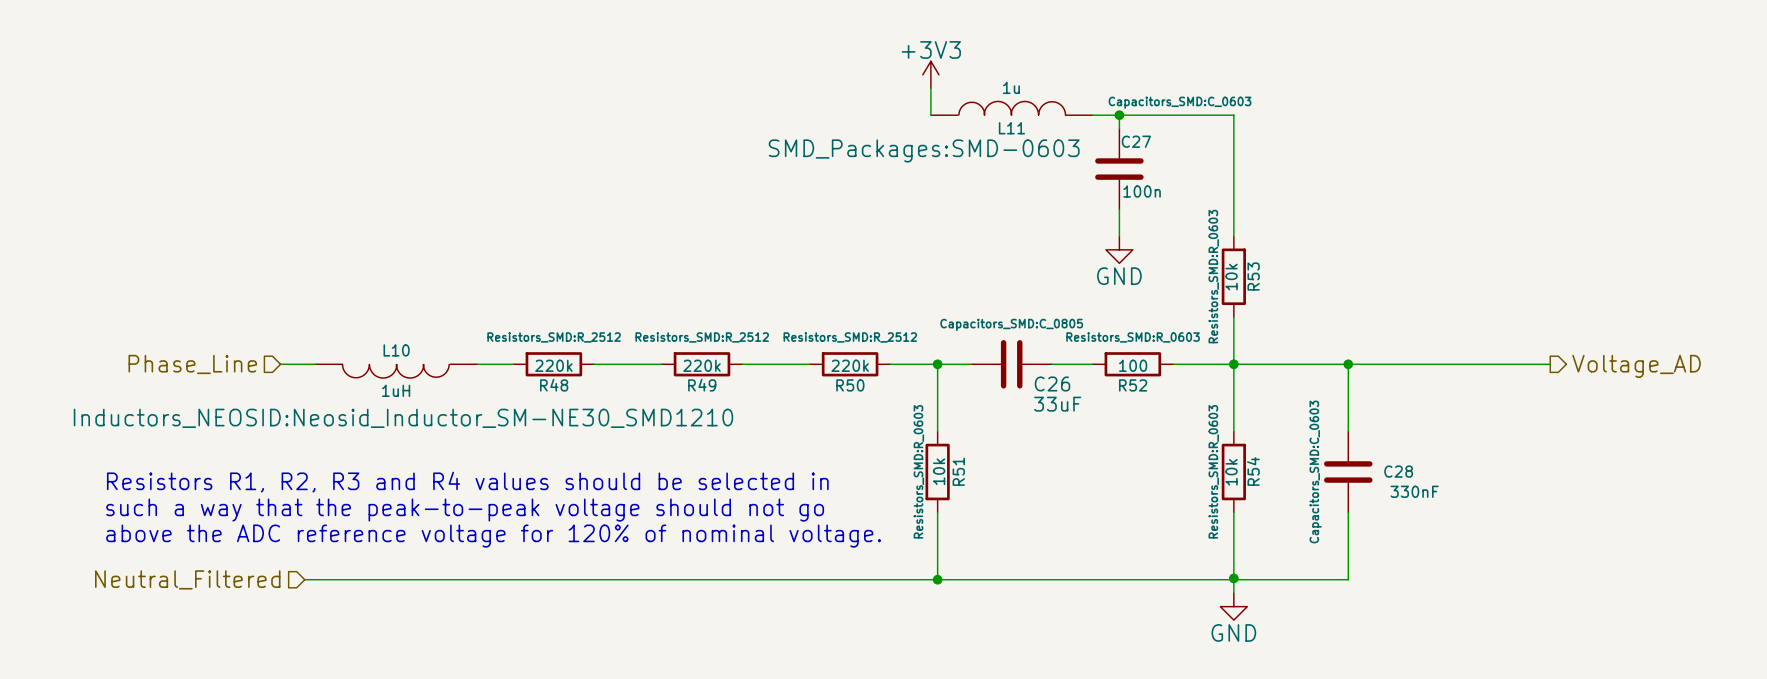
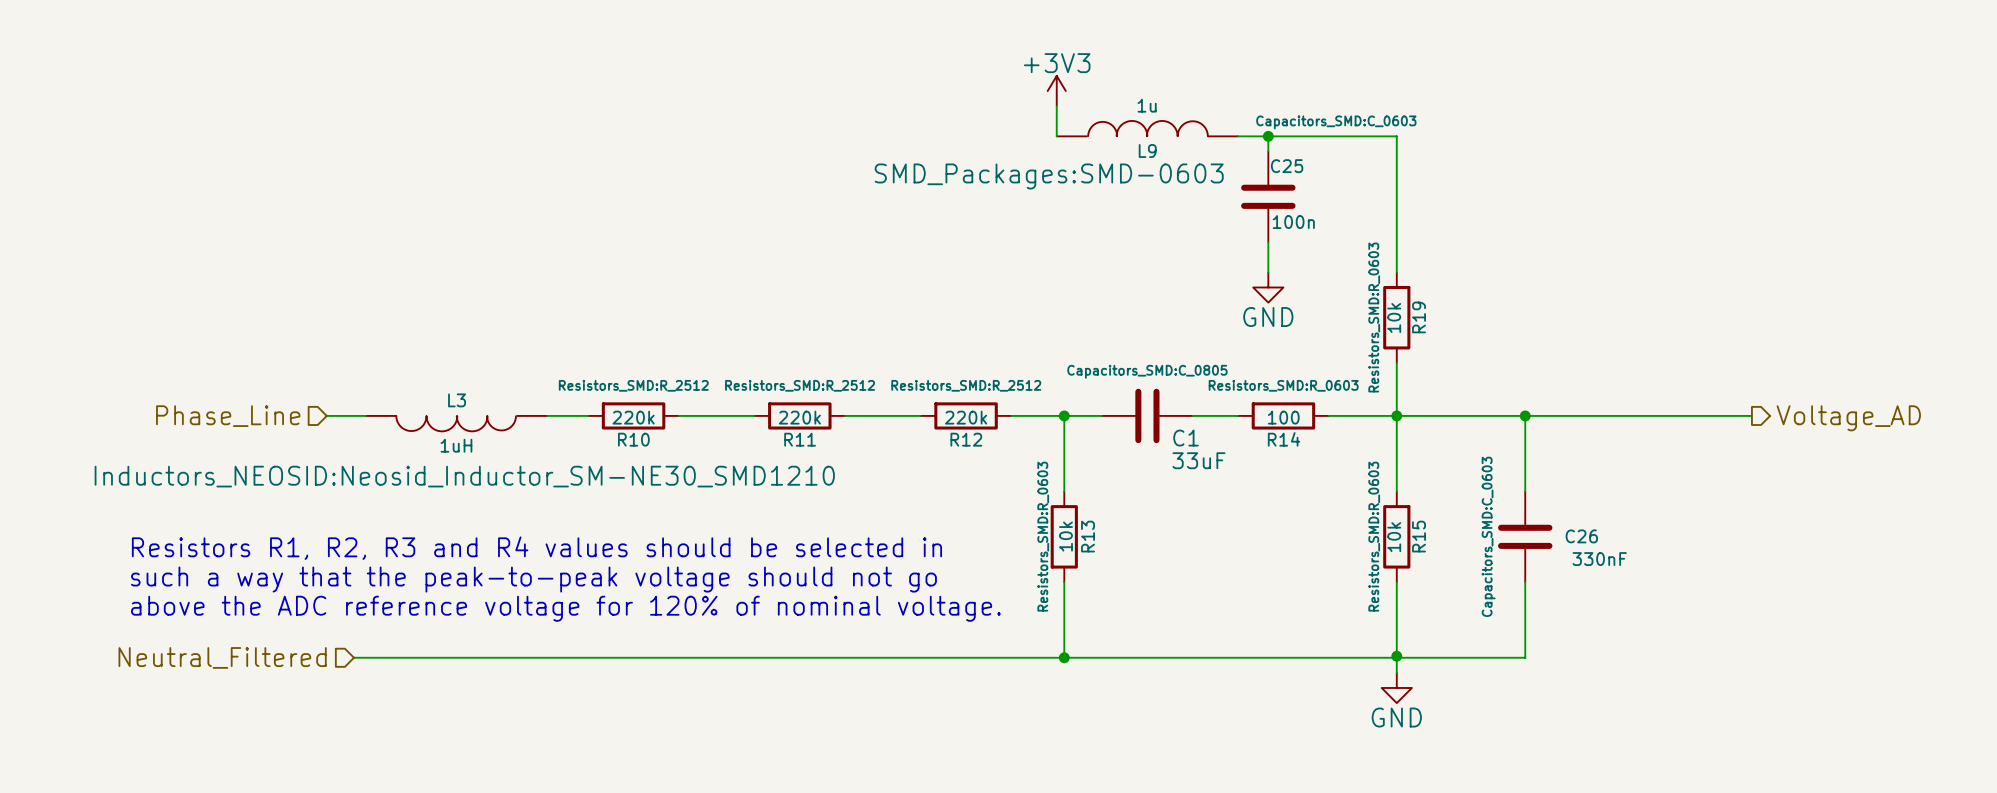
L11 name: L11 (1011, 128) -> L9 (1147, 151)
C27 name: C27 (1136, 141) -> C25 (1287, 166)
R53 name: R53 (1253, 276) -> R19 (1419, 317)
L10 name: L10 (396, 350) -> L3 (457, 400)
C26 name: C26 (1052, 383) -> C1 (1186, 438)
R48 name: R48 (554, 385) -> R10 (633, 439)
R49 name: R49 (702, 385) -> R11 (800, 439)
R50 name: R50 (850, 385) -> R12 (966, 439)
R52 name: R52 (1133, 385) -> R14 (1284, 439)
R51 name: R51 (958, 471) -> R13 (1088, 536)
R54 name: R54 (1253, 471) -> R15 (1419, 536)
C28 name: C28 (1398, 471) -> C26 (1581, 536)

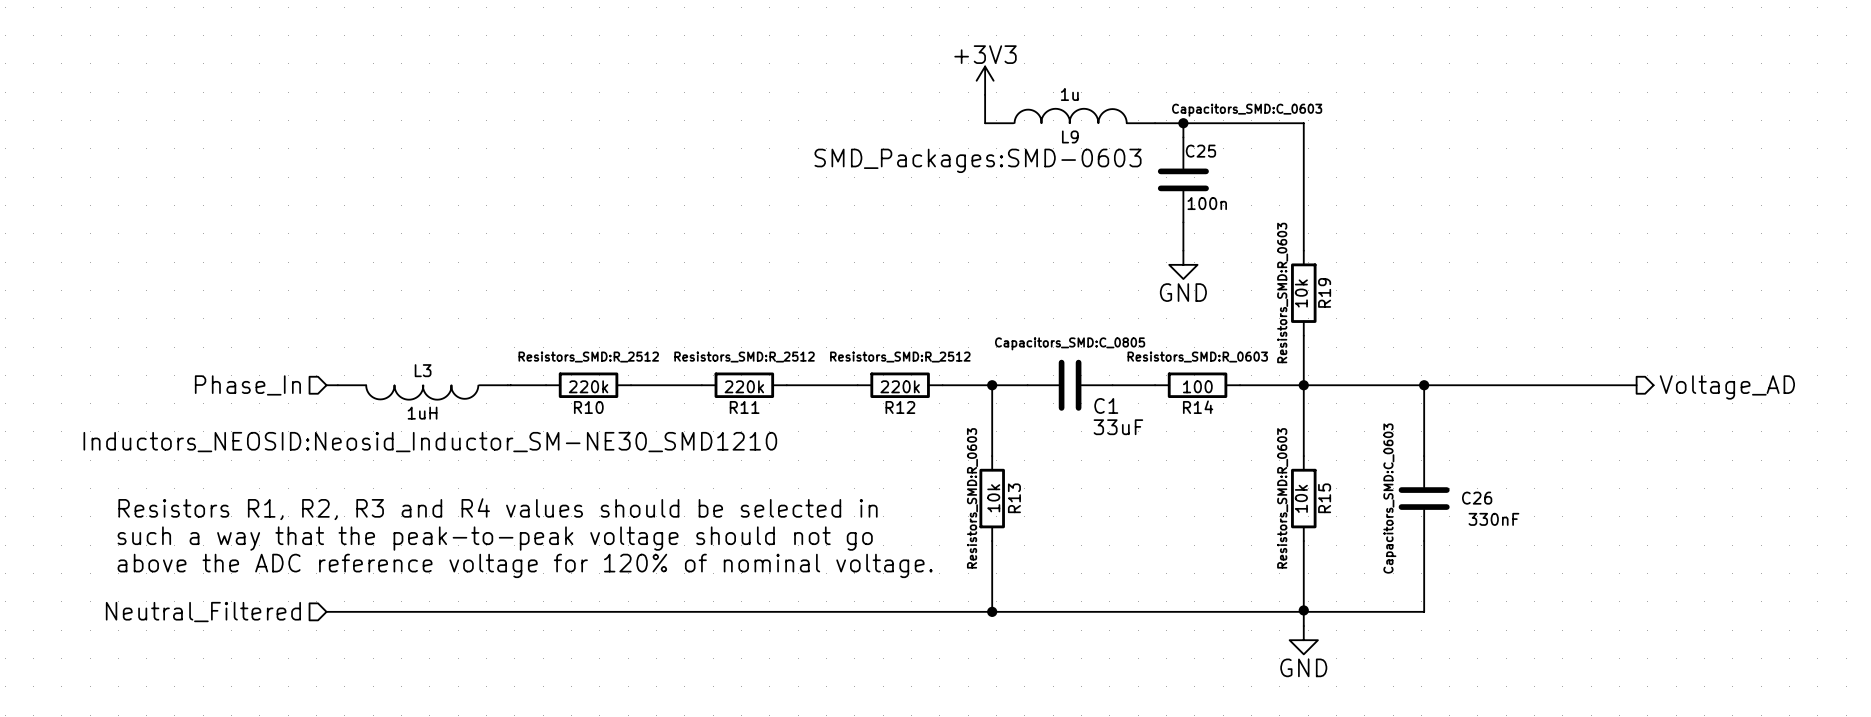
wire: (326, 415) (353, 415) -> none
hierarchical label: Phase_Line (228, 416) -> Phase_In (247, 385)

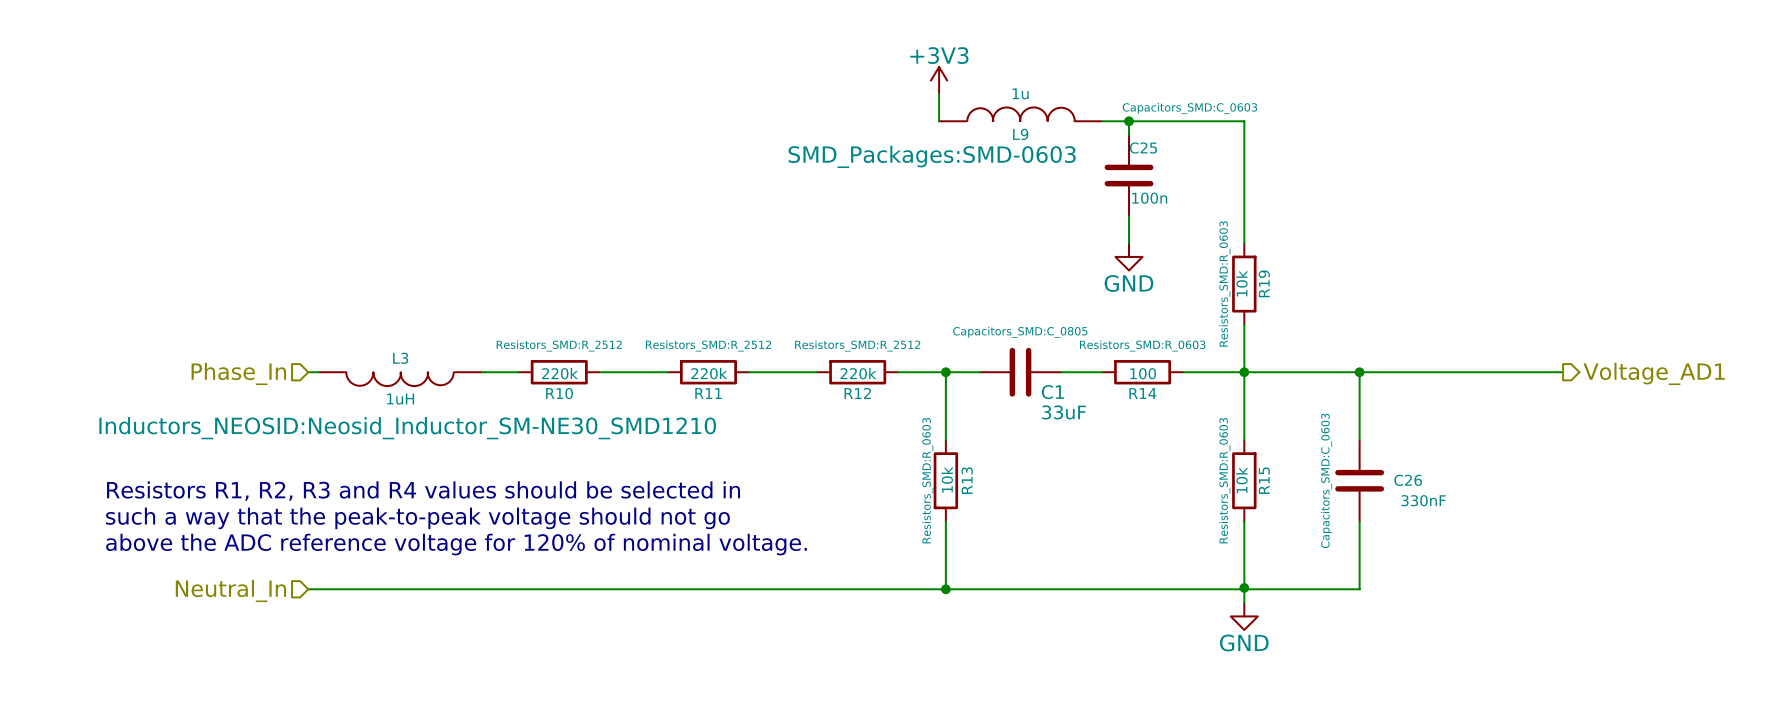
hierarchical label: Voltage_AD (1727, 387) -> Voltage_AD1 (1654, 373)
hierarchical label: Neutral_Filtered (203, 612) -> Neutral_In (230, 590)

